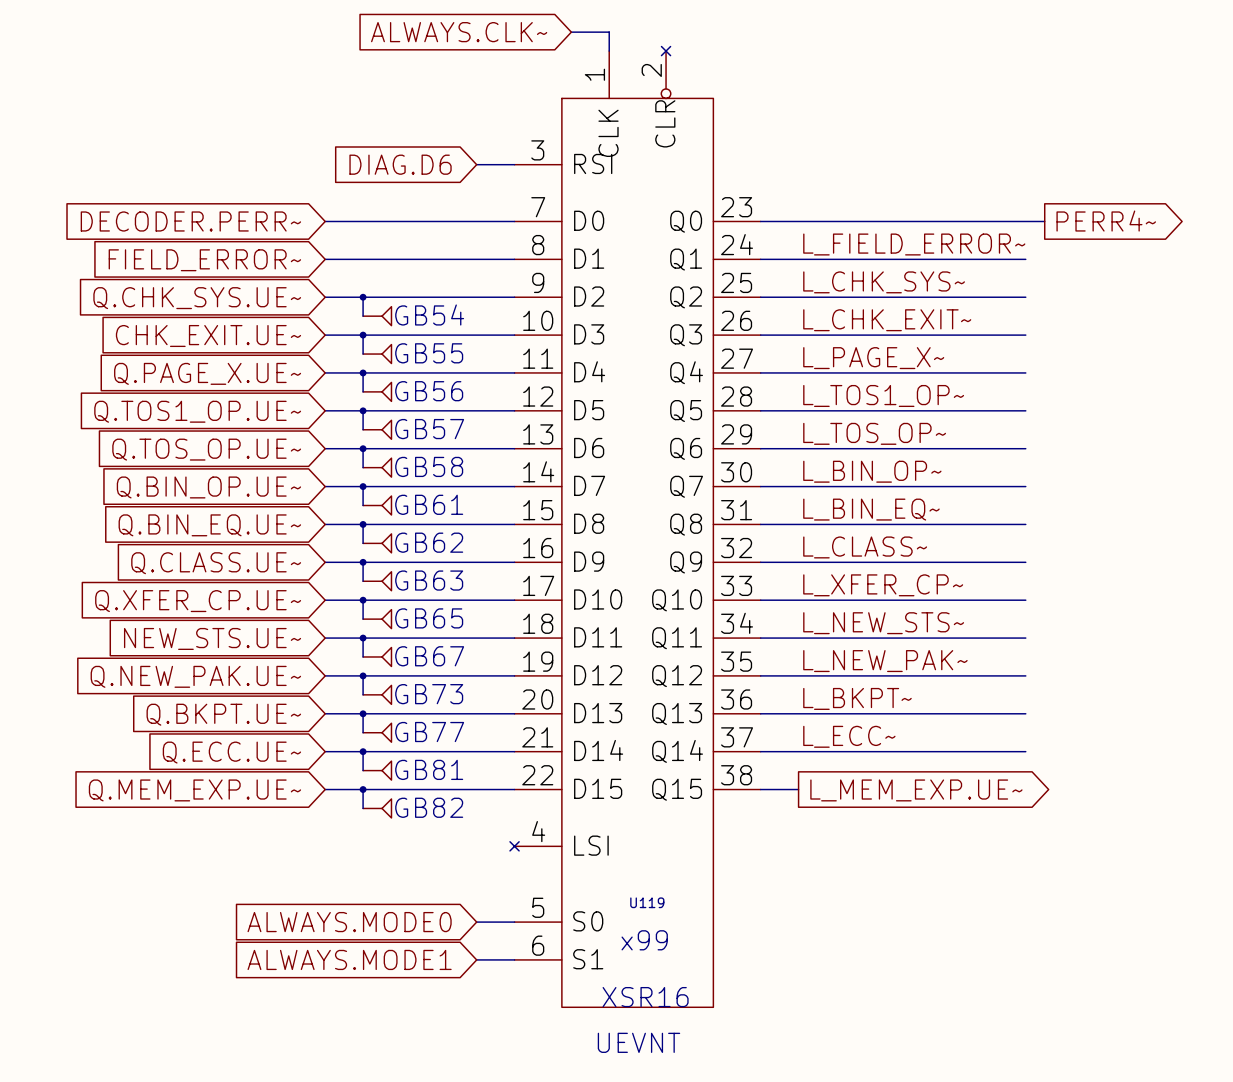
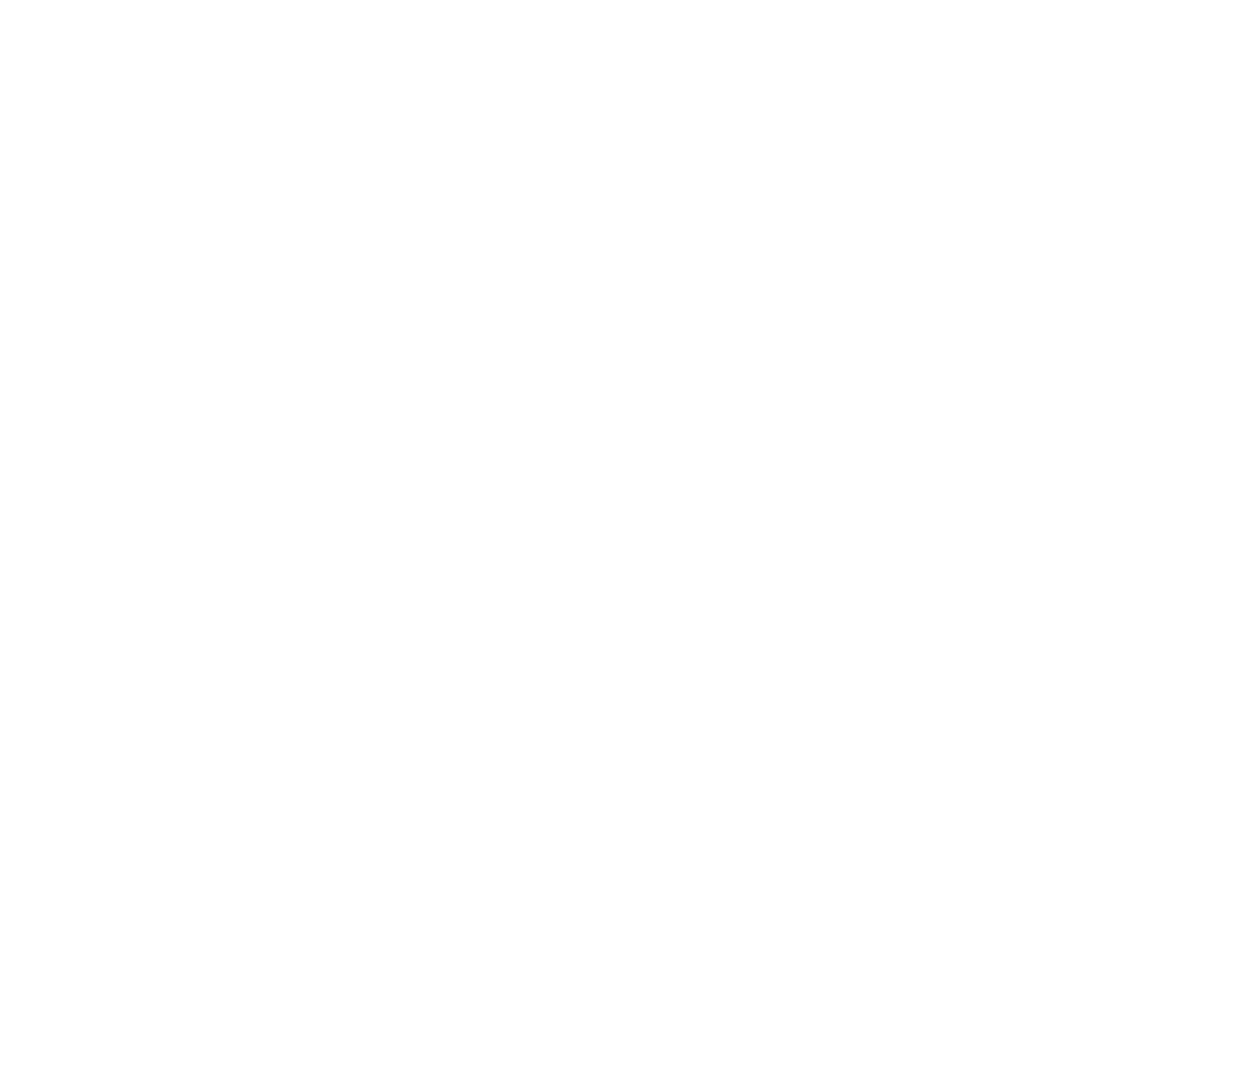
global label: ALWAYS.CLK~ (459, 32) -> none
wire: (571, 32) (609, 32) (609, 51) -> none
no-connect mark: (666, 51) -> none
global label: DIAG.D6 (400, 164) -> none
wire: (476, 164) (514, 164) -> none
global label: DECODER.PERR~ (190, 221) -> none
wire: (325, 221) (514, 221) -> none
wire: (760, 221) (1044, 221) -> none
global label: PERR4~ (1106, 221) -> none
label: L_FIELD_ERROR~ (914, 244) -> none
wire: (325, 259) (514, 259) -> none
wire: (760, 259) (1025, 259) -> none
global label: FIELD_ERROR~ (204, 260) -> none
label: L_CHK_SYS~ (884, 282) -> none
wire: (325, 297) (514, 297) -> none
wire: (363, 297) (363, 316) -> none
junction: (363, 297) -> none
wire: (760, 297) (1025, 297) -> none
global label: Q.CHK_SYS.UE~ (197, 298) -> none
GB54: (377, 316) -> none
label: L_CHK_EXIT~ (887, 320) -> none
wire: (325, 335) (514, 335) -> none
wire: (363, 335) (363, 354) -> none
junction: (363, 335) -> none
wire: (760, 335) (1025, 335) -> none
global label: CHK_EXIT.UE~ (208, 336) -> none
GB55: (377, 354) -> none
label: L_PAGE_X~ (873, 358) -> none
wire: (325, 372) (514, 372) -> none
wire: (363, 372) (363, 391) -> none
junction: (363, 372) -> none
wire: (760, 372) (1025, 372) -> none
global label: Q.PAGE_X.UE~ (207, 373) -> none
GB56: (377, 391) -> none
label: L_TOS1_OP~ (883, 395) -> none
wire: (325, 410) (514, 410) -> none
wire: (363, 410) (363, 429) -> none
junction: (363, 410) -> none
wire: (760, 410) (1025, 410) -> none
global label: Q.TOS1_OP.UE~ (197, 411) -> none
GB57: (377, 429) -> none
label: L_TOS_OP~ (874, 433) -> none
wire: (325, 448) (514, 448) -> none
wire: (363, 448) (363, 467) -> none
junction: (363, 448) -> none
wire: (760, 448) (1025, 448) -> none
global label: Q.TOS_OP.UE~ (206, 449) -> none
GB58: (377, 467) -> none
label: L_BIN_OP~ (872, 471) -> none
wire: (325, 486) (514, 486) -> none
wire: (363, 486) (363, 505) -> none
junction: (363, 486) -> none
wire: (760, 486) (1025, 486) -> none
global label: Q.BIN_OP.UE~ (208, 487) -> none
GB61: (377, 505) -> none
label: L_BIN_EQ~ (871, 509) -> none
wire: (325, 524) (514, 524) -> none
wire: (363, 524) (363, 543) -> none
junction: (363, 524) -> none
wire: (760, 524) (1025, 524) -> none
global label: Q.BIN_EQ.UE~ (209, 525) -> none
U119: XSR16 (637, 529) -> none
GB62: (377, 543) -> none
label: L_CLASS~ (865, 547) -> none
wire: (325, 562) (514, 562) -> none
wire: (363, 562) (363, 581) -> none
junction: (363, 562) -> none
wire: (760, 562) (1025, 562) -> none
global label: Q.CLASS.UE~ (216, 563) -> none
GB63: (377, 581) -> none
label: L_XFER_CP~ (883, 585) -> none
wire: (325, 600) (514, 600) -> none
wire: (363, 600) (363, 619) -> none
junction: (363, 600) -> none
wire: (760, 600) (1025, 600) -> none
global label: Q.XFER_CP.UE~ (198, 601) -> none
GB65: (377, 619) -> none
label: L_NEW_STS~ (883, 623) -> none
global label: NEW_STS.UE~ (212, 638) -> none
wire: (325, 638) (514, 638) -> none
wire: (363, 638) (363, 656) -> none
junction: (363, 638) -> none
wire: (760, 638) (1025, 638) -> none
GB67: (377, 656) -> none
label: L_NEW_PAK~ (885, 661) -> none
wire: (325, 675) (514, 675) -> none
wire: (363, 675) (363, 694) -> none
junction: (363, 675) -> none
wire: (760, 675) (1025, 675) -> none
global label: Q.NEW_PAK.UE~ (195, 676) -> none
GB73: (377, 694) -> none
label: L_BKPT~ (857, 698) -> none
wire: (325, 713) (514, 713) -> none
wire: (363, 713) (363, 732) -> none
junction: (363, 713) -> none
wire: (760, 713) (1025, 713) -> none
global label: Q.BKPT.UE~ (223, 714) -> none
GB77: (377, 732) -> none
label: L_ECC~ (849, 736) -> none
wire: (325, 751) (514, 751) -> none
wire: (363, 751) (363, 770) -> none
junction: (363, 751) -> none
wire: (760, 751) (1025, 751) -> none
global label: Q.ECC.UE~ (231, 752) -> none
GB81: (377, 770) -> none
wire: (325, 789) (514, 789) -> none
wire: (363, 789) (363, 808) -> none
junction: (363, 789) -> none
wire: (760, 789) (798, 789) -> none
global label: Q.MEM_EXP.UE~ (194, 790) -> none
global label: L_MEM_EXP.UE~ (916, 790) -> none
GB82: (377, 808) -> none
no-connect mark: (514, 846) -> none
global label: ALWAYS.MODE0 (349, 922) -> none
wire: (476, 922) (514, 922) -> none
global label: ALWAYS.MODE1 (349, 959) -> none
wire: (476, 959) (514, 959) -> none

